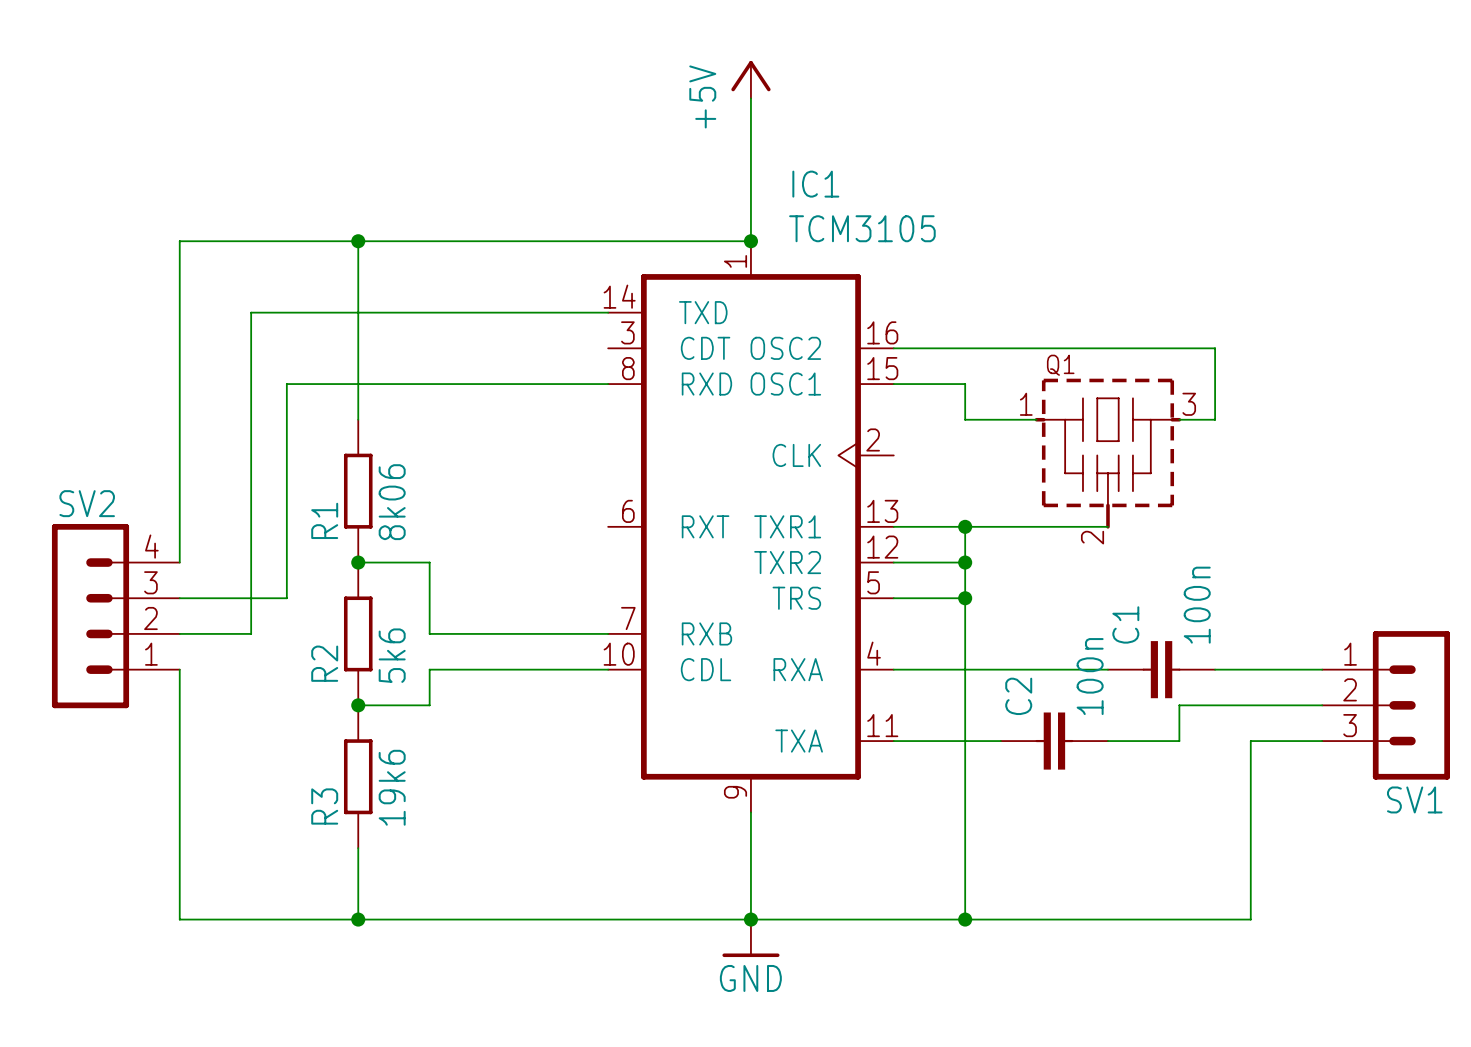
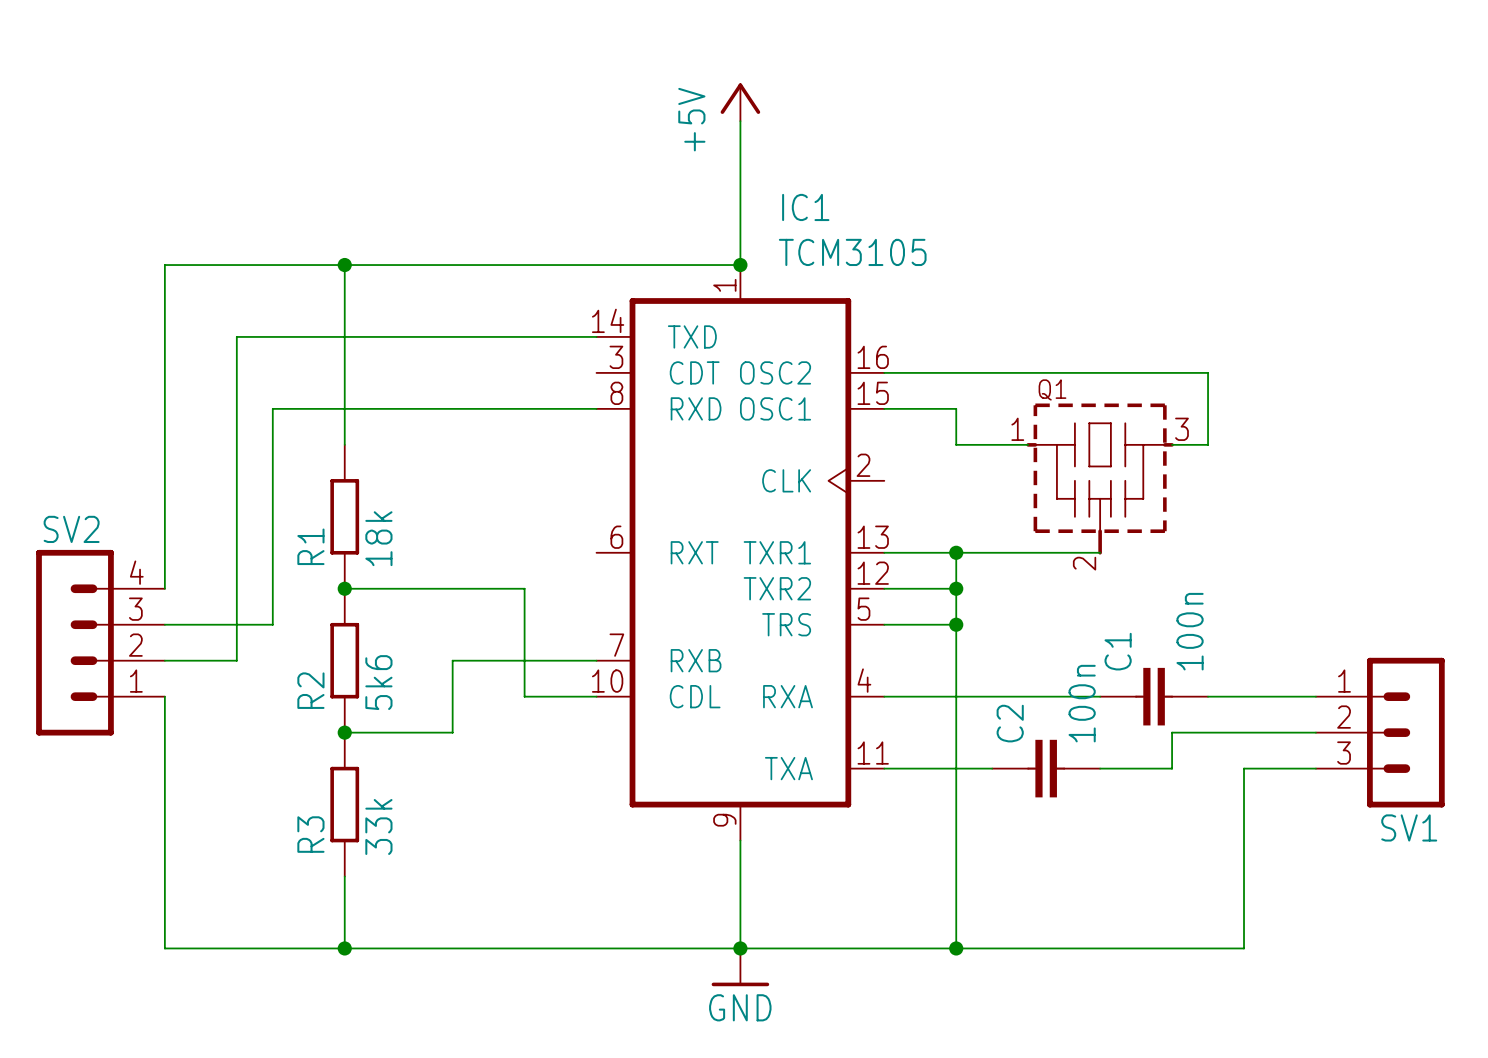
R1 value: 8k06 (392, 502) -> 18k (378, 538)
wire: (429, 562) (429, 633) (465, 633) -> (416, 588) (524, 588) (524, 696)
wire: (536, 669) (429, 669) (429, 705) -> (452, 660) (452, 732) (416, 732)
R3 value: 19k6 (392, 787) -> 33k (378, 826)

